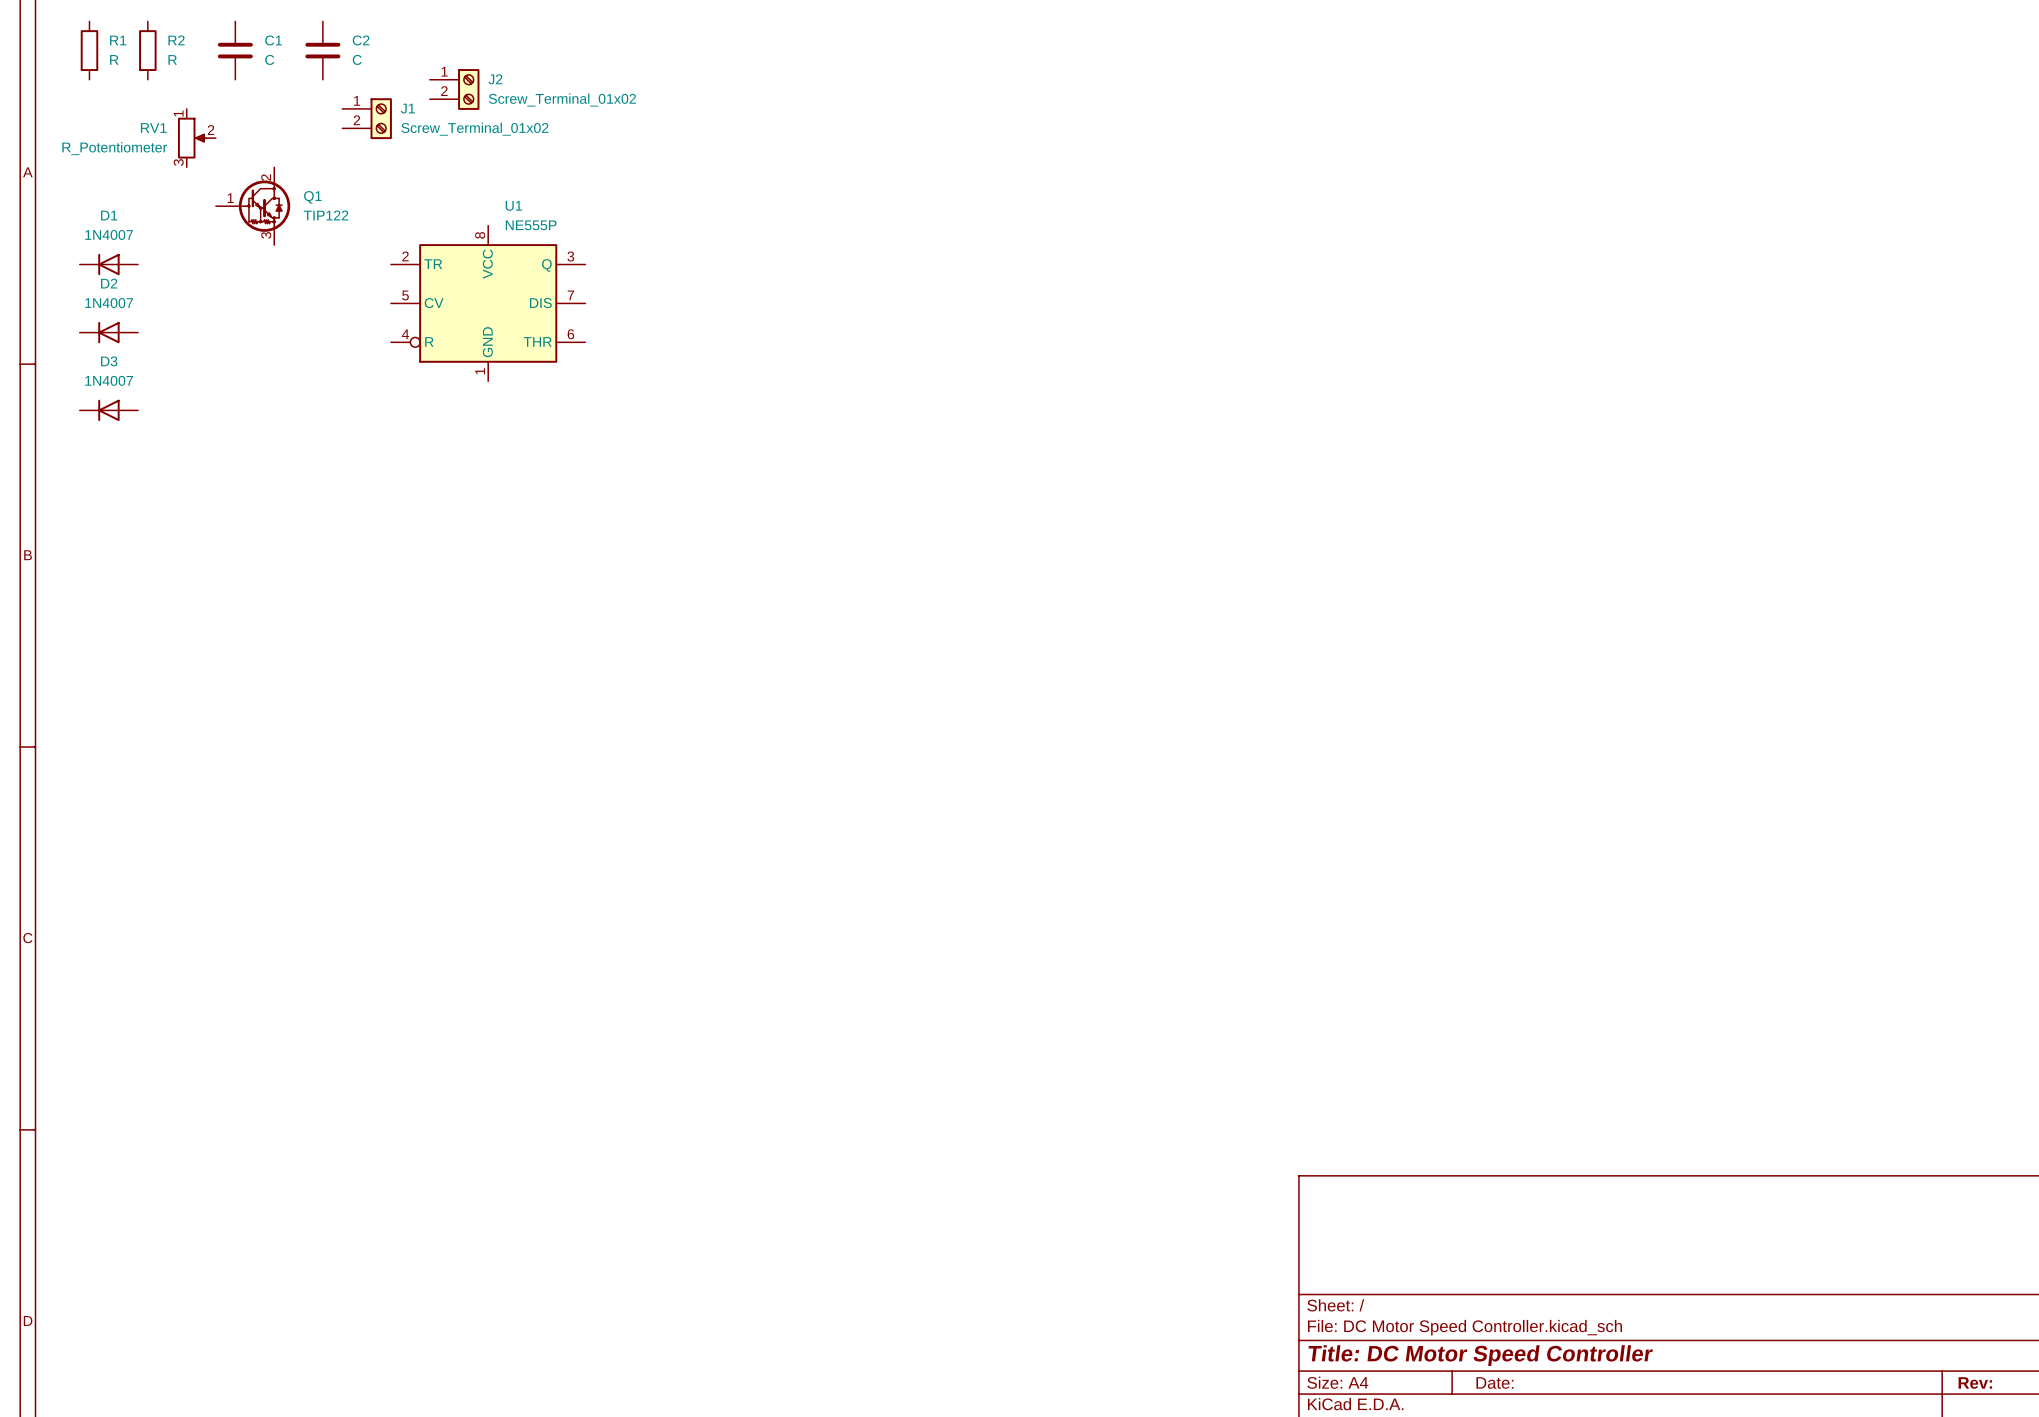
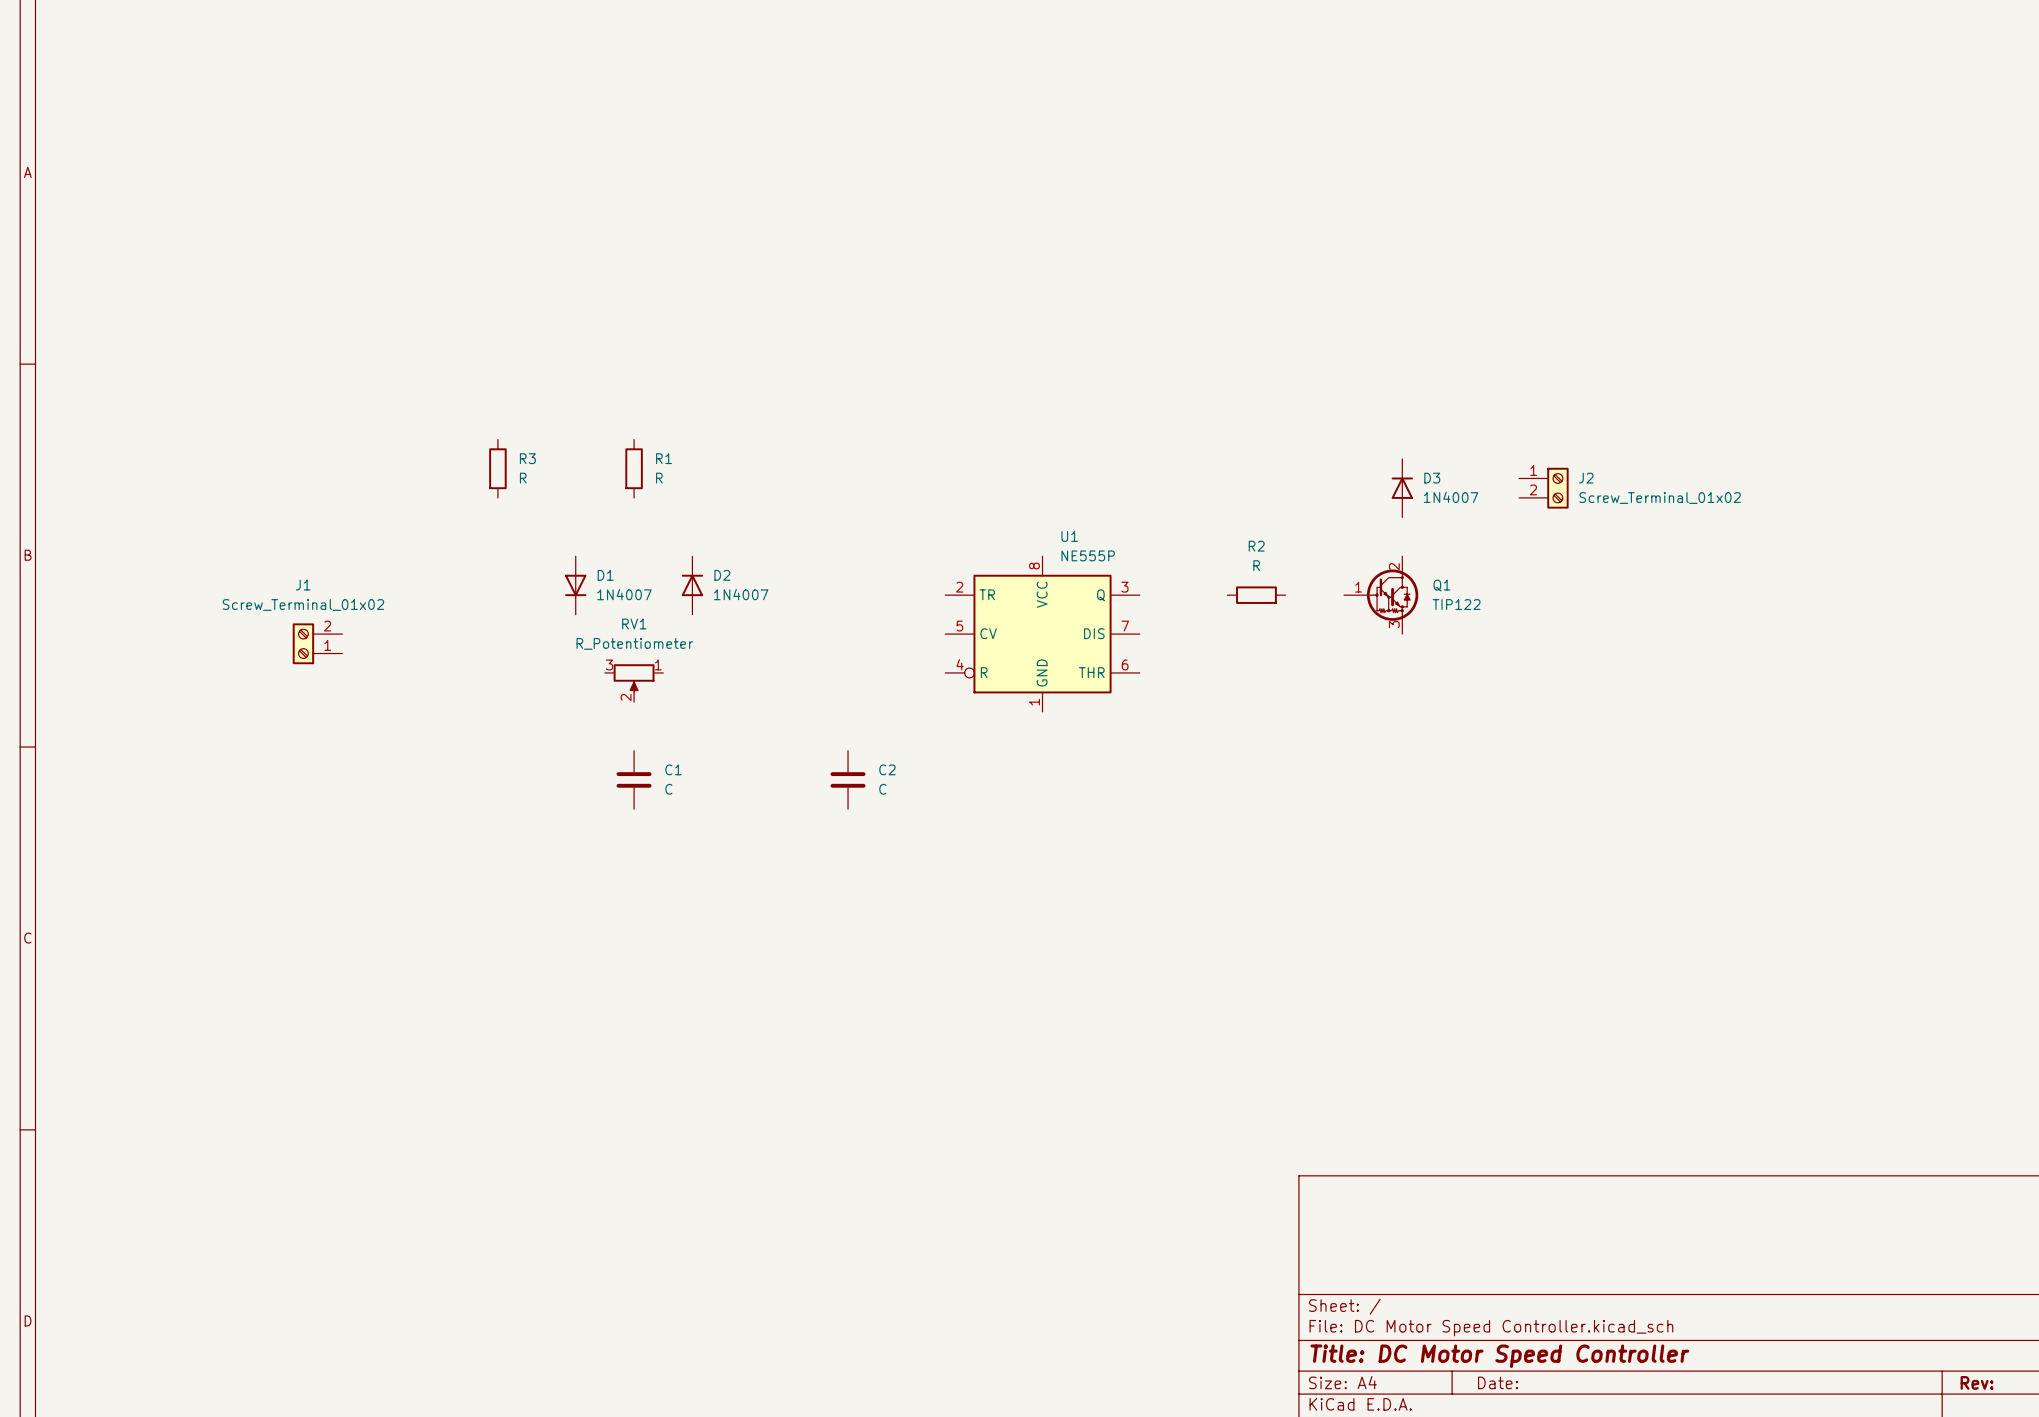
R2 name position: R2 (176, 40) -> R2 (1256, 546)
R1 position: (89, 50) -> (634, 468)
R2 rotation: 0° (147, 50) -> 90° clockwise (1256, 595)
R2 position: (147, 50) -> (1256, 595)
C1 position: (235, 50) -> (634, 779)
C2 position: (322, 50) -> (848, 779)
R2 value position: R (172, 59) -> R (1256, 565)
J2 position: (454, 89) -> (1543, 488)
J1 name position: J1 (407, 108) -> J1 (303, 585)
J1 position: (367, 118) -> (317, 643)
J1 rotation: 0° (381, 118) -> 180° (303, 643)
RV1 name position: RV1 (153, 128) -> RV1 (634, 623)
J1 value position: Screw_Terminal_01x02 (474, 129) -> Screw_Terminal_01x02 (303, 605)
RV1 rotation: 0° (192, 138) -> 90° clockwise (634, 678)
RV1 position: (196, 138) -> (634, 683)
RV1 value position: R_Potentiometer (114, 148) -> R_Potentiometer (634, 643)
Q1 position: (253, 206) -> (1381, 595)
D1 name position: D1 (109, 215) -> D1 (605, 575)
D1 value position: 1N4007 (109, 234) -> 1N4007 (624, 594)
D1 rotation: 0° (108, 264) -> 90° counterclockwise (575, 585)
D1 position: (108, 264) -> (575, 585)
D2 name position: D2 (109, 283) -> D2 (722, 575)
D2 value position: 1N4007 (109, 303) -> 1N4007 (741, 594)
U1 position: (488, 303) -> (1042, 634)
D2 rotation: 0° (108, 332) -> 90° clockwise (692, 585)
D2 position: (108, 332) -> (692, 585)
D3 name position: D3 (109, 361) -> D3 (1432, 478)
D3 value position: 1N4007 (109, 380) -> 1N4007 (1451, 497)
D3 rotation: 0° (108, 410) -> 90° clockwise (1402, 488)
D3 position: (108, 410) -> (1402, 488)
R3: none -> R (497, 468)

